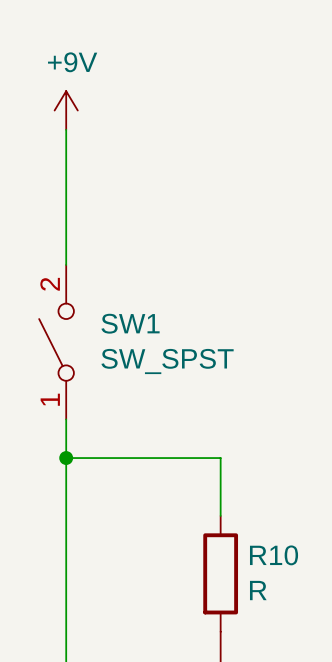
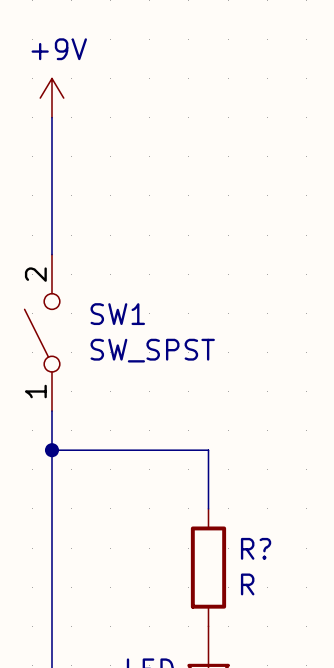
R10 name: R10 (274, 555) -> R? (256, 548)

